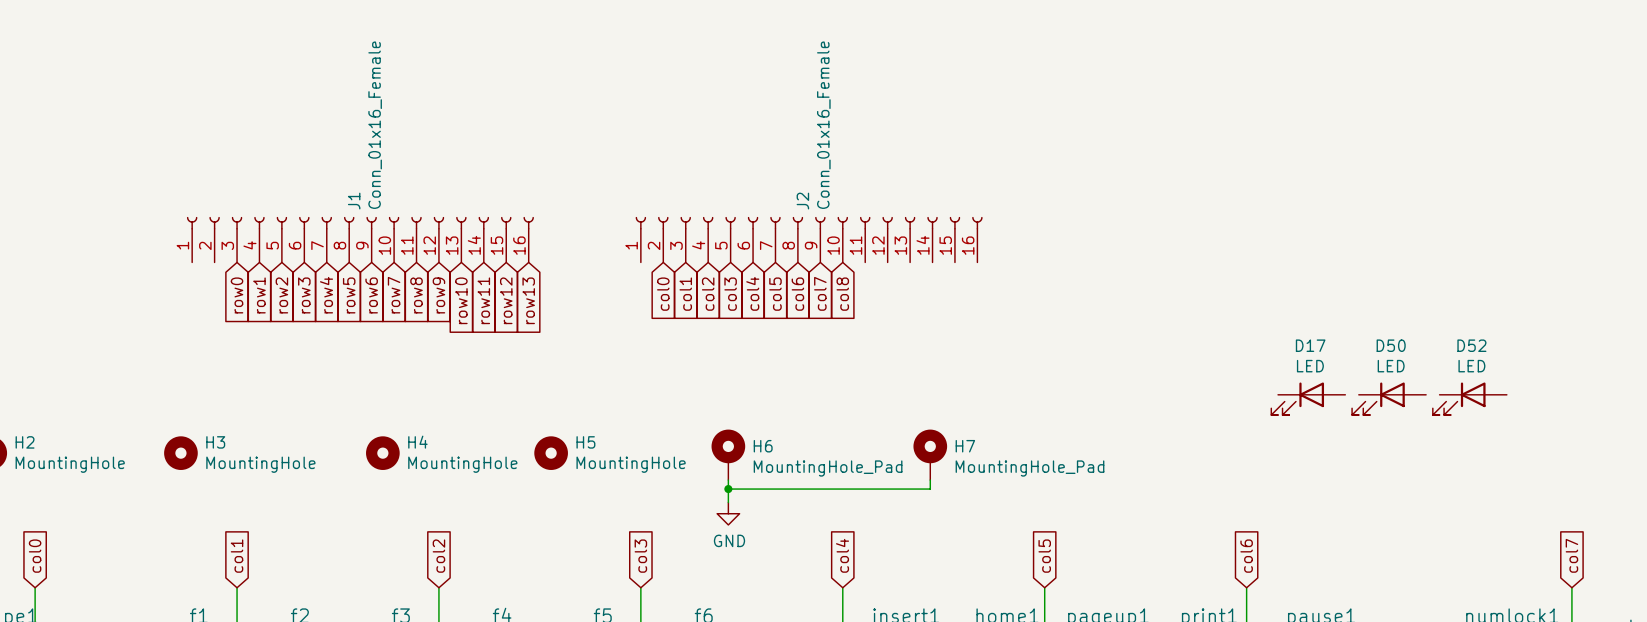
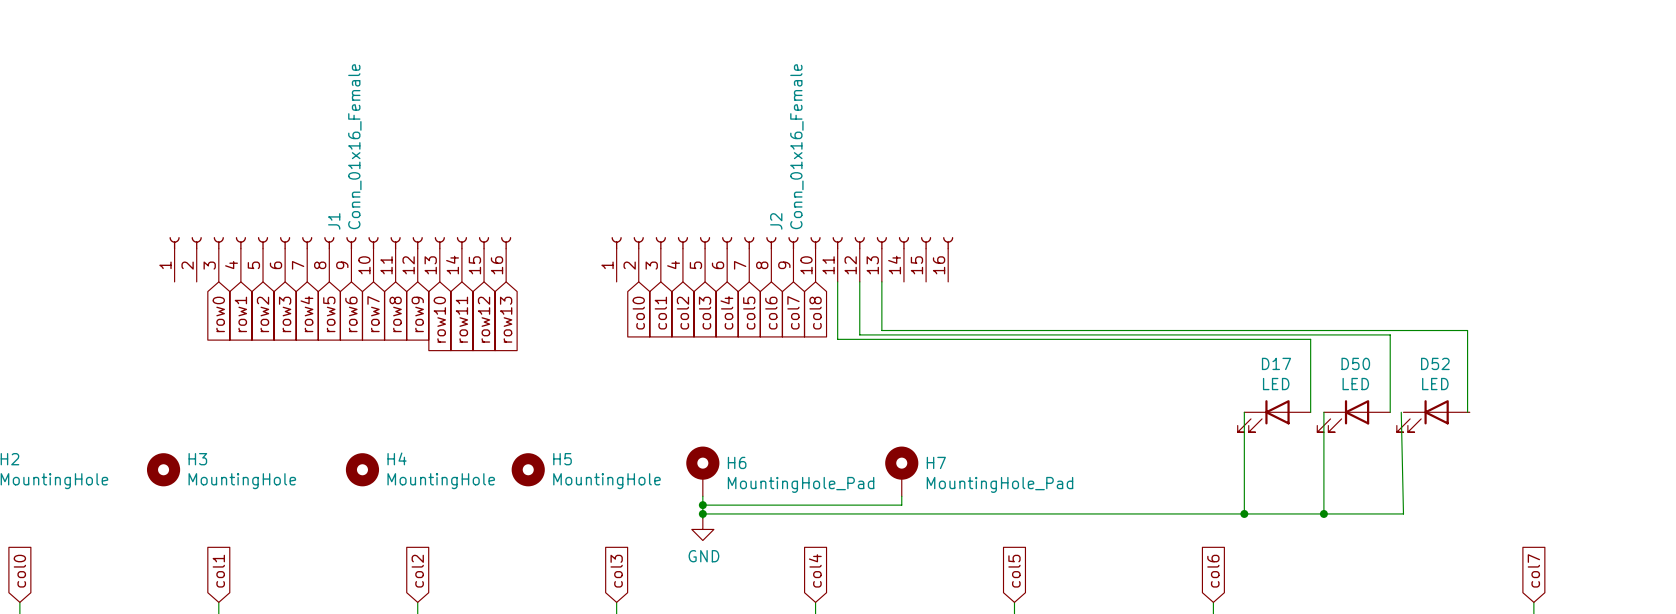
wire: none -> (837, 281) (837, 339) (1310, 339) (1310, 412)
wire: none -> (859, 281) (859, 334) (1390, 334) (1390, 412)
wire: none -> (881, 281) (881, 330) (1467, 330) (1467, 412)
wire: none -> (1244, 412) (1244, 513)
wire: none -> (1323, 412) (1323, 513)
wire: none -> (1401, 412) (1403, 513) (702, 513)
junction: none -> (702, 513)
junction: none -> (1244, 513)
junction: none -> (1323, 513)

